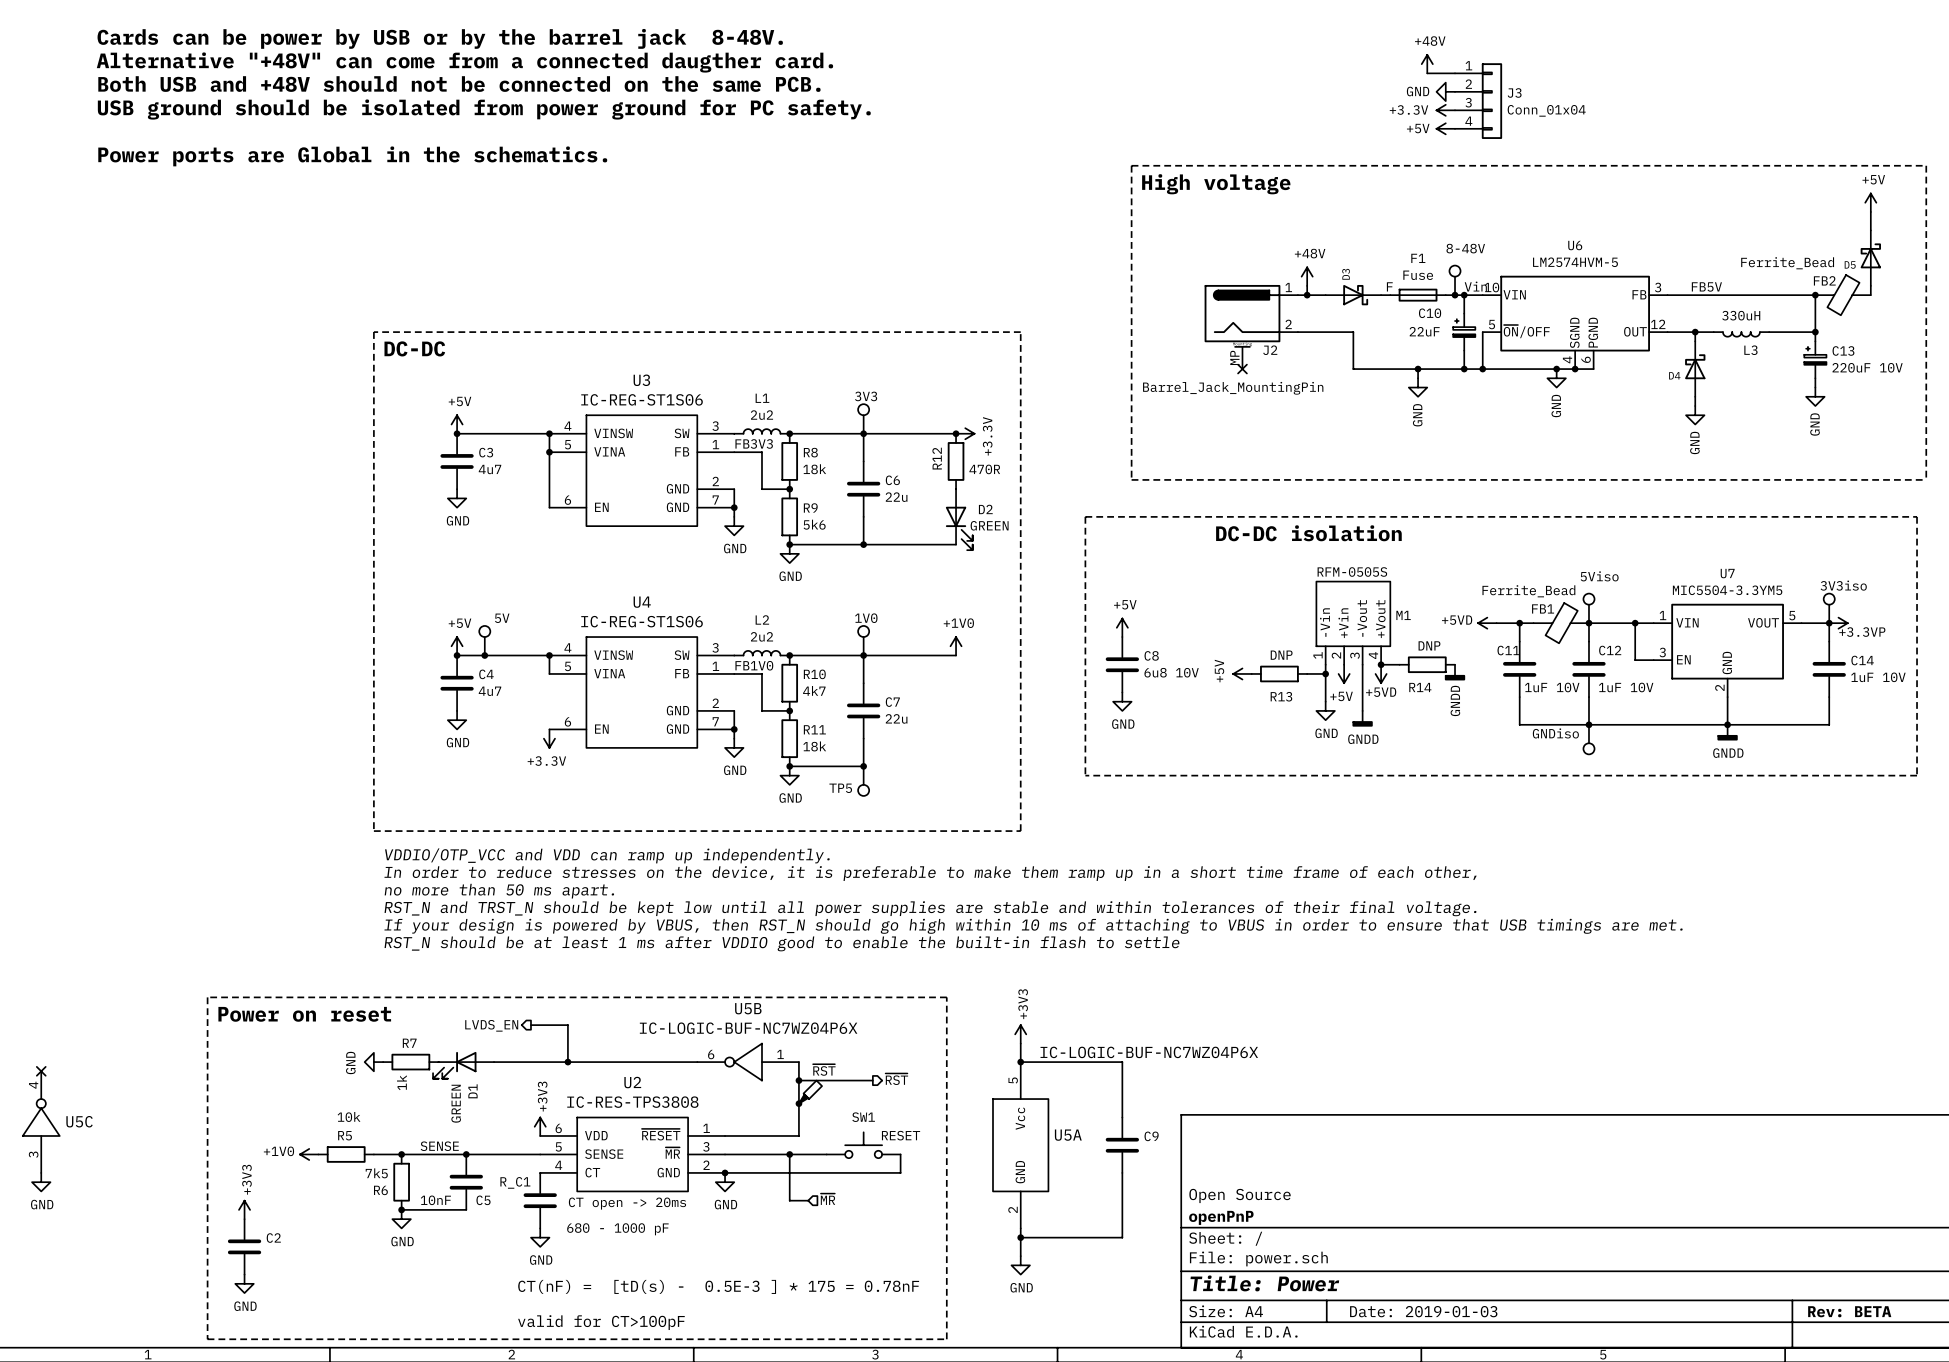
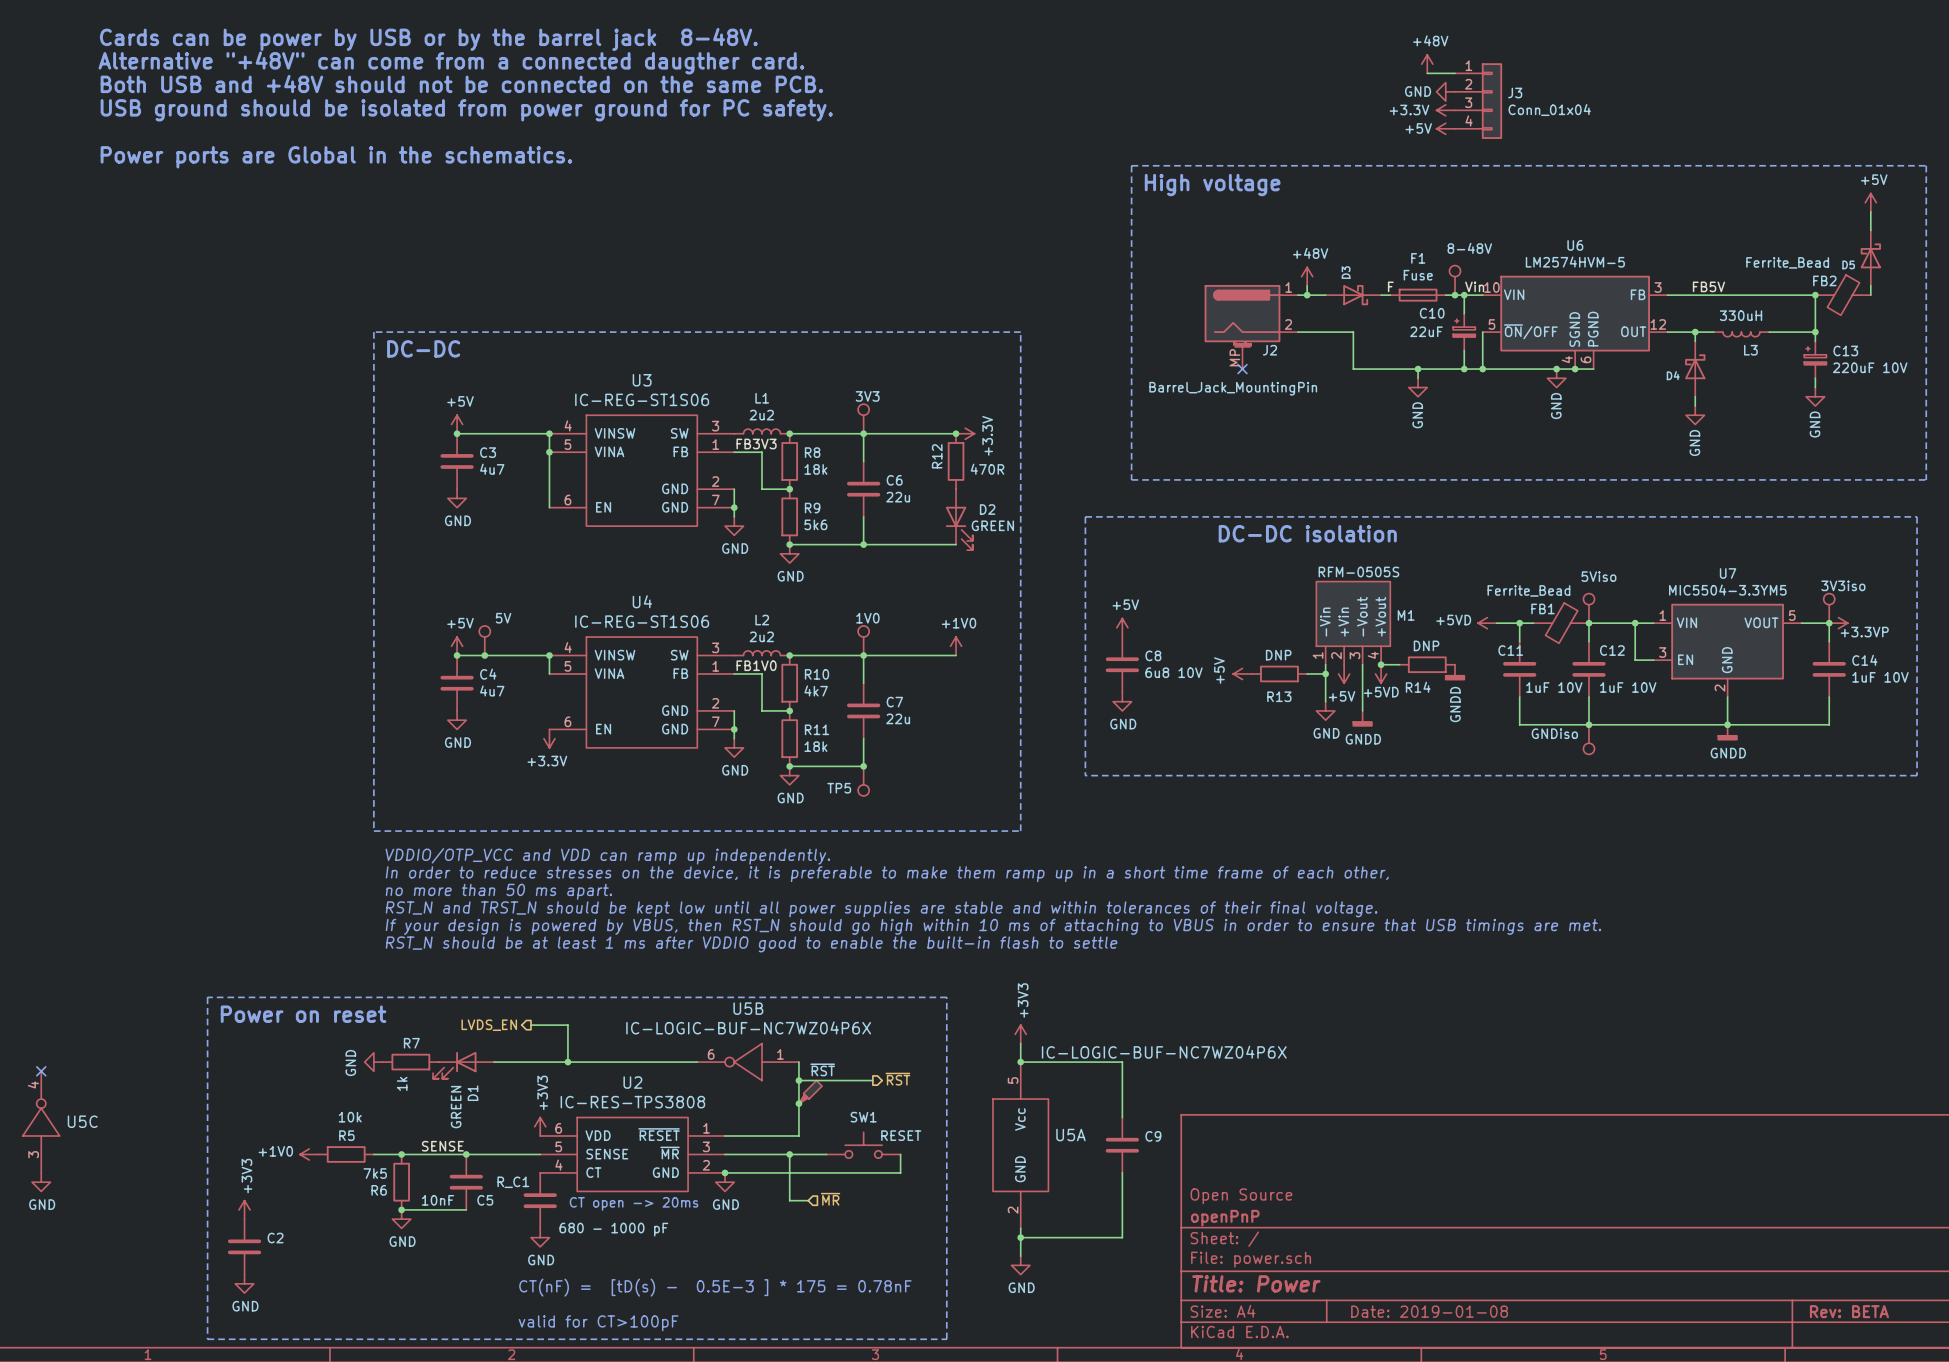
title block: Date: 2019-01-03 (1423, 1311) -> Date: 2019-01-08 (1429, 1311)

